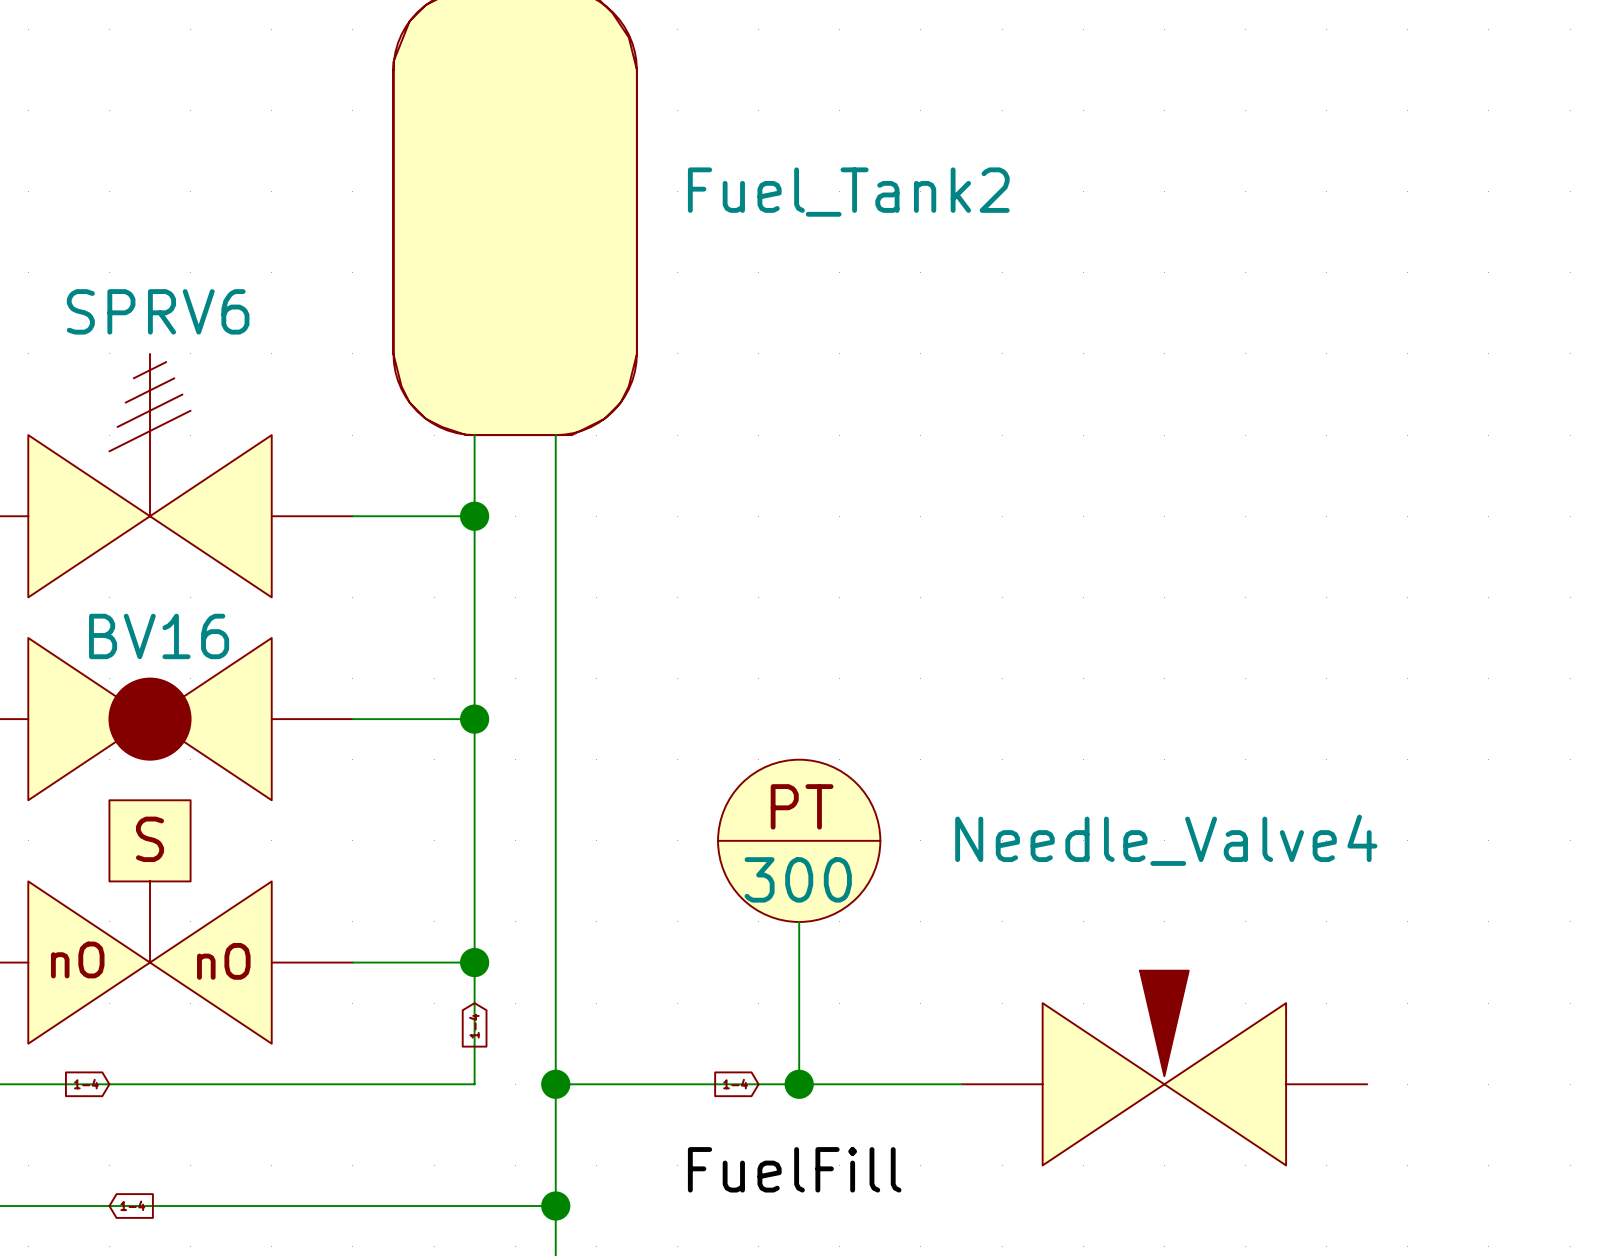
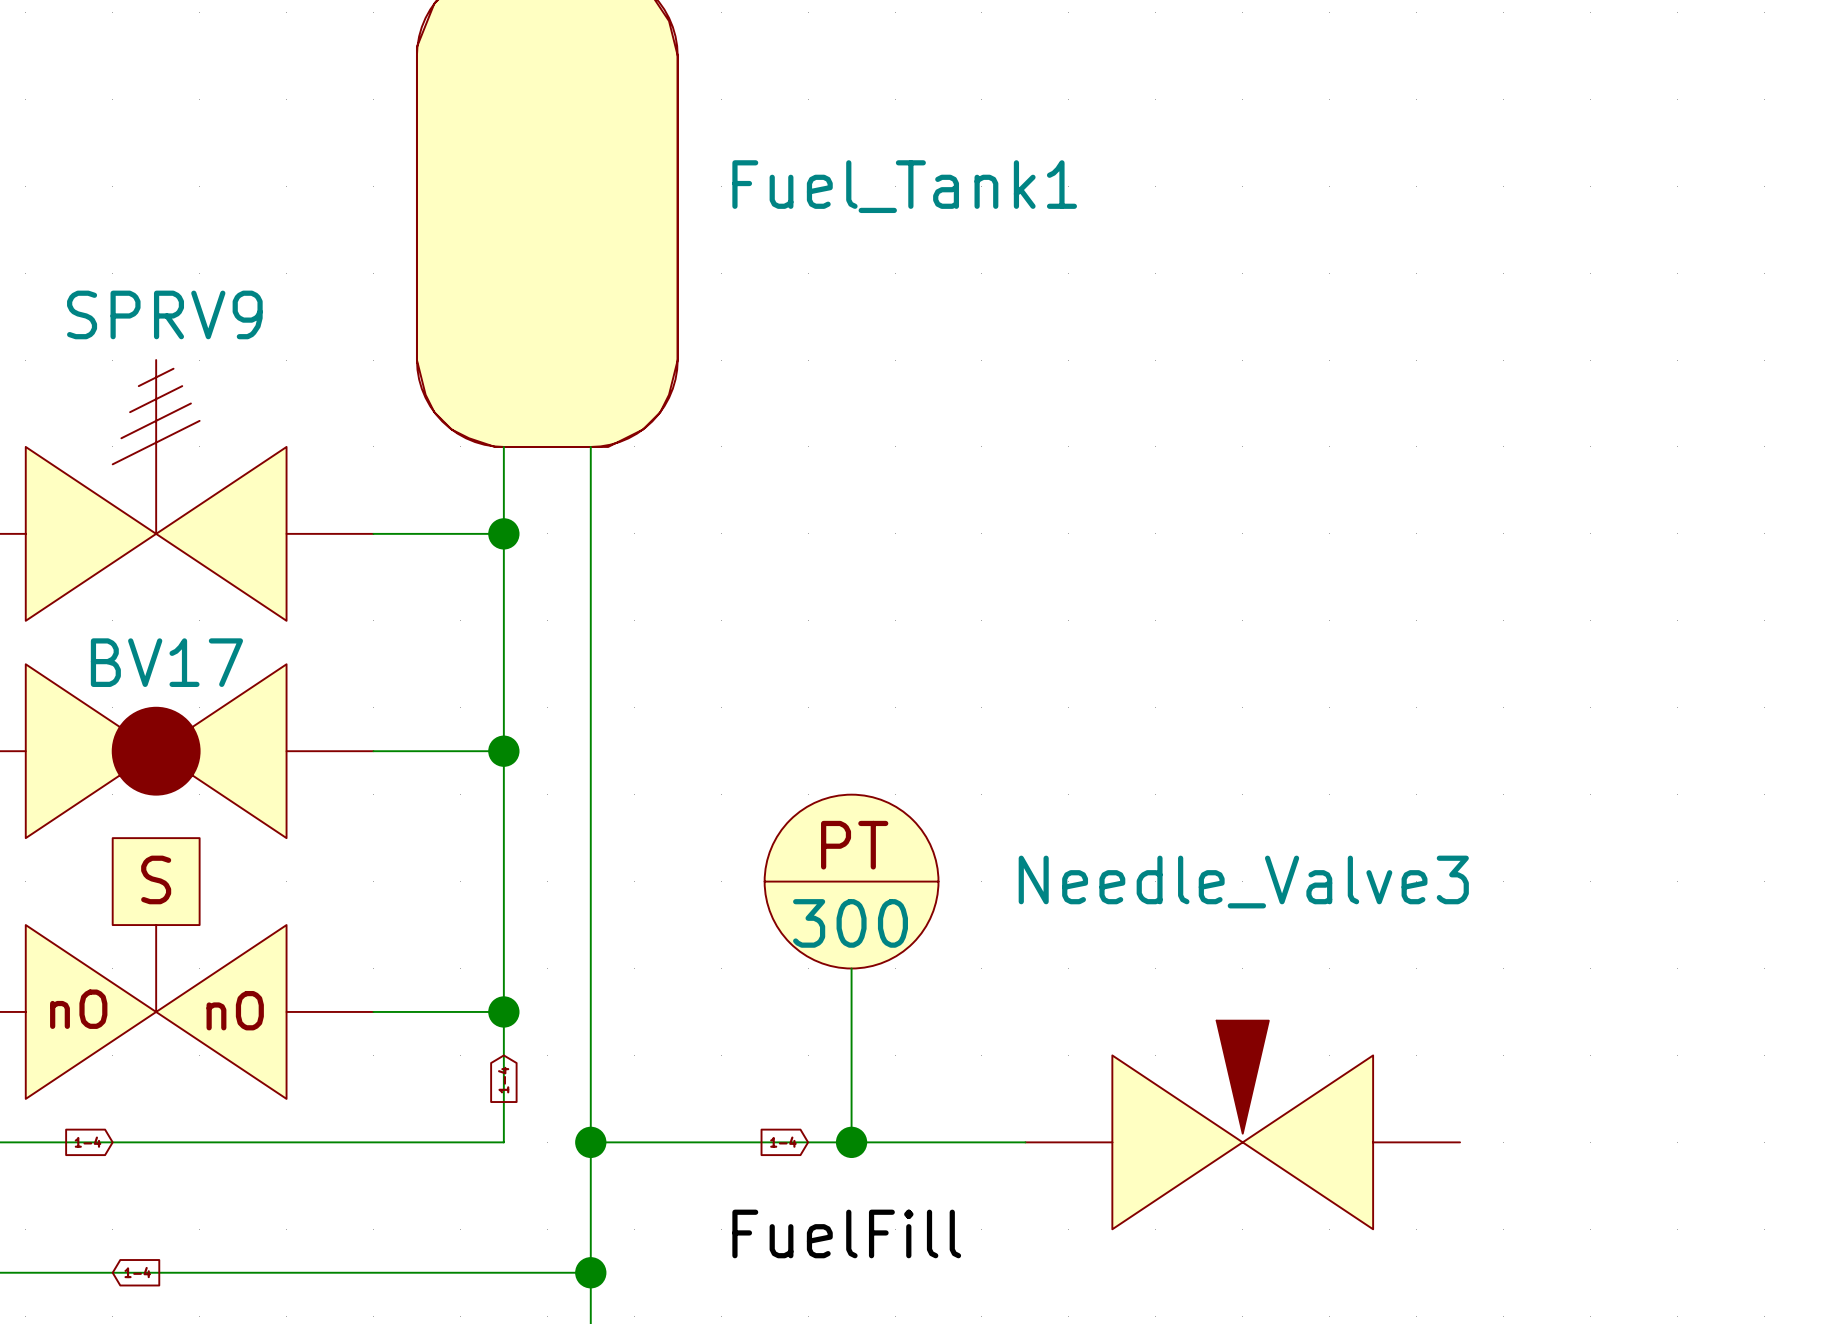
Fuel_Tank2 name: Fuel_Tank2 (848, 192) -> Fuel_Tank1 (904, 186)
SPRV6 name: SPRV6 (158, 311) -> SPRV9 (164, 314)
BV16 name: BV16 (159, 636) -> BV17 (166, 662)
Needle_Valve4 name: Needle_Valve4 (1166, 840) -> Needle_Valve3 (1243, 882)

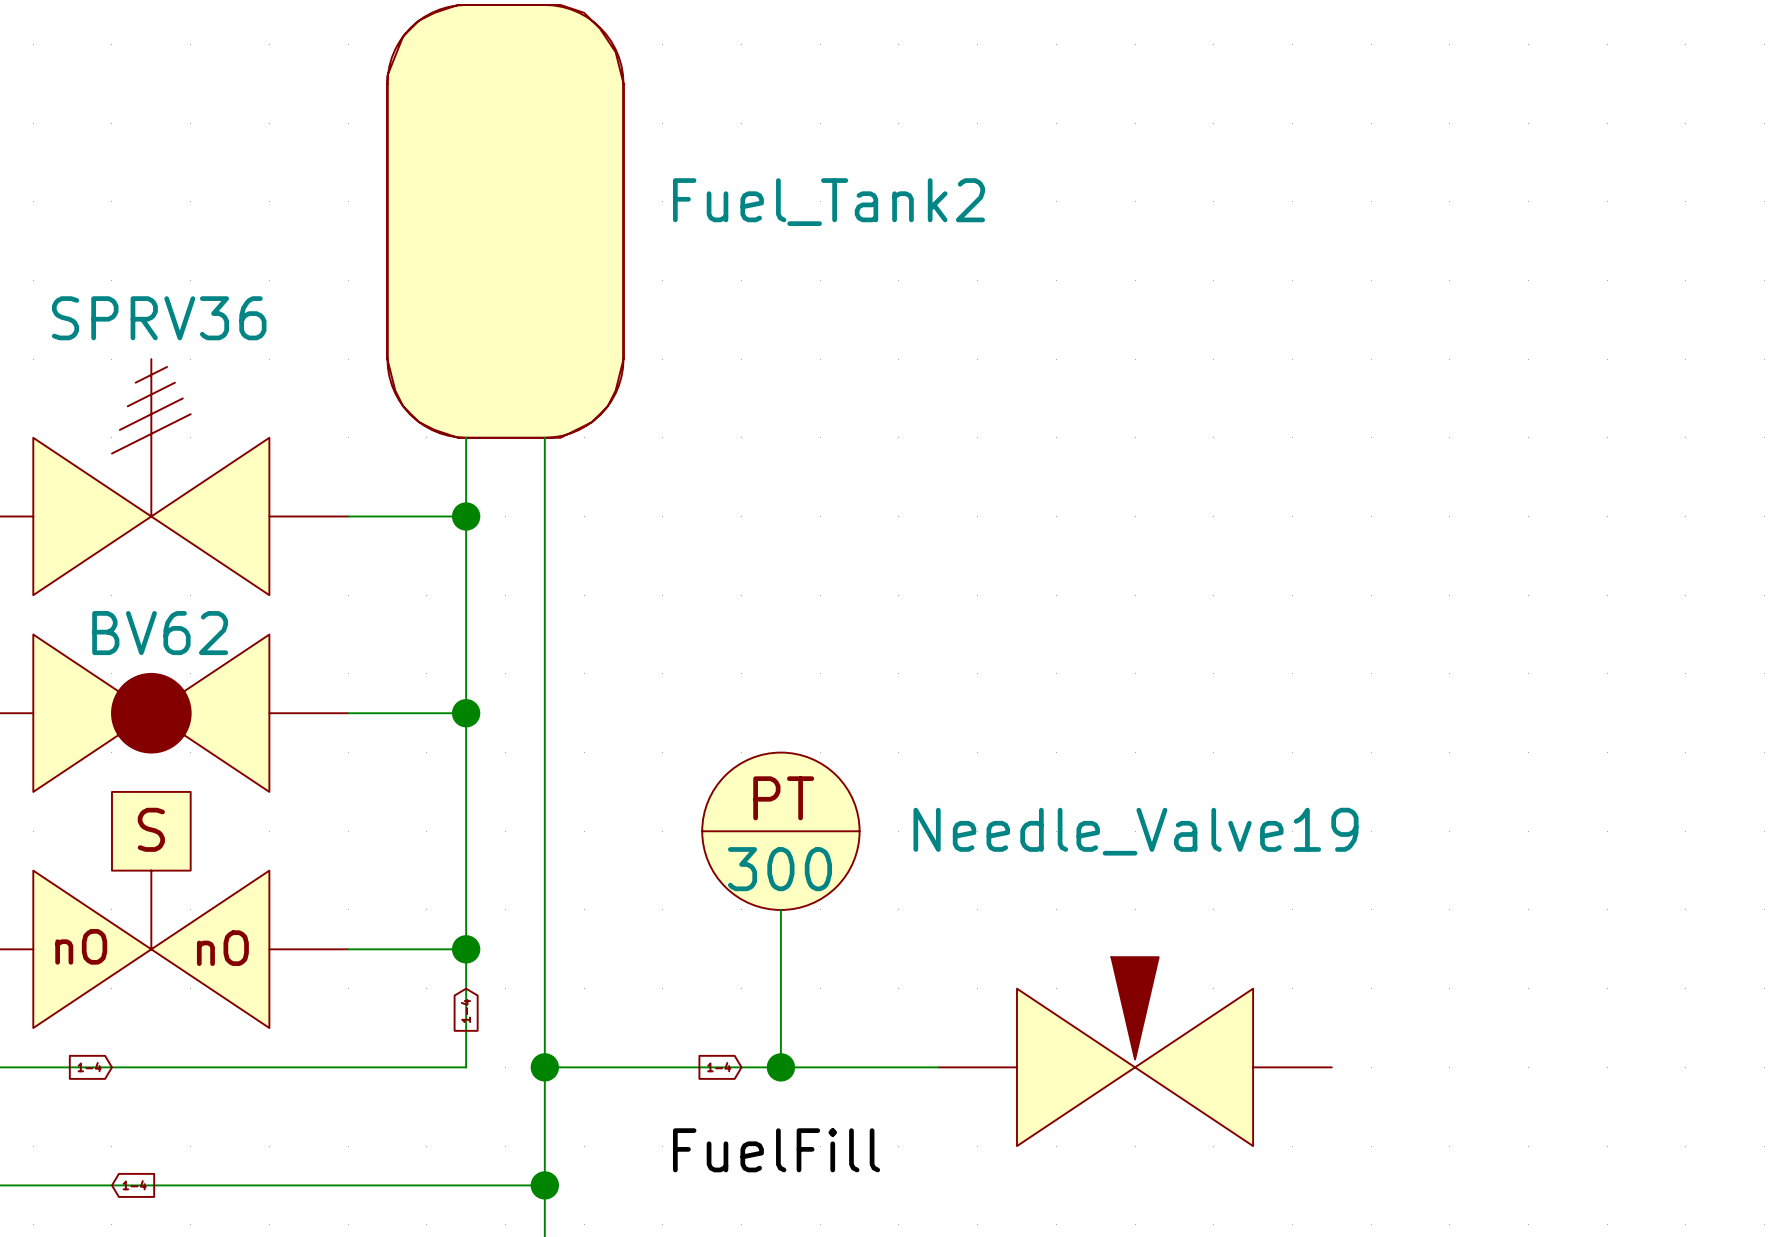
Fuel_Tank1 name: Fuel_Tank1 (904, 186) -> Fuel_Tank2 (828, 202)
SPRV9 name: SPRV9 (164, 314) -> SPRV36 (159, 318)
BV17 name: BV17 (166, 662) -> BV62 (160, 633)
Needle_Valve3 name: Needle_Valve3 (1243, 882) -> Needle_Valve19 (1135, 831)

